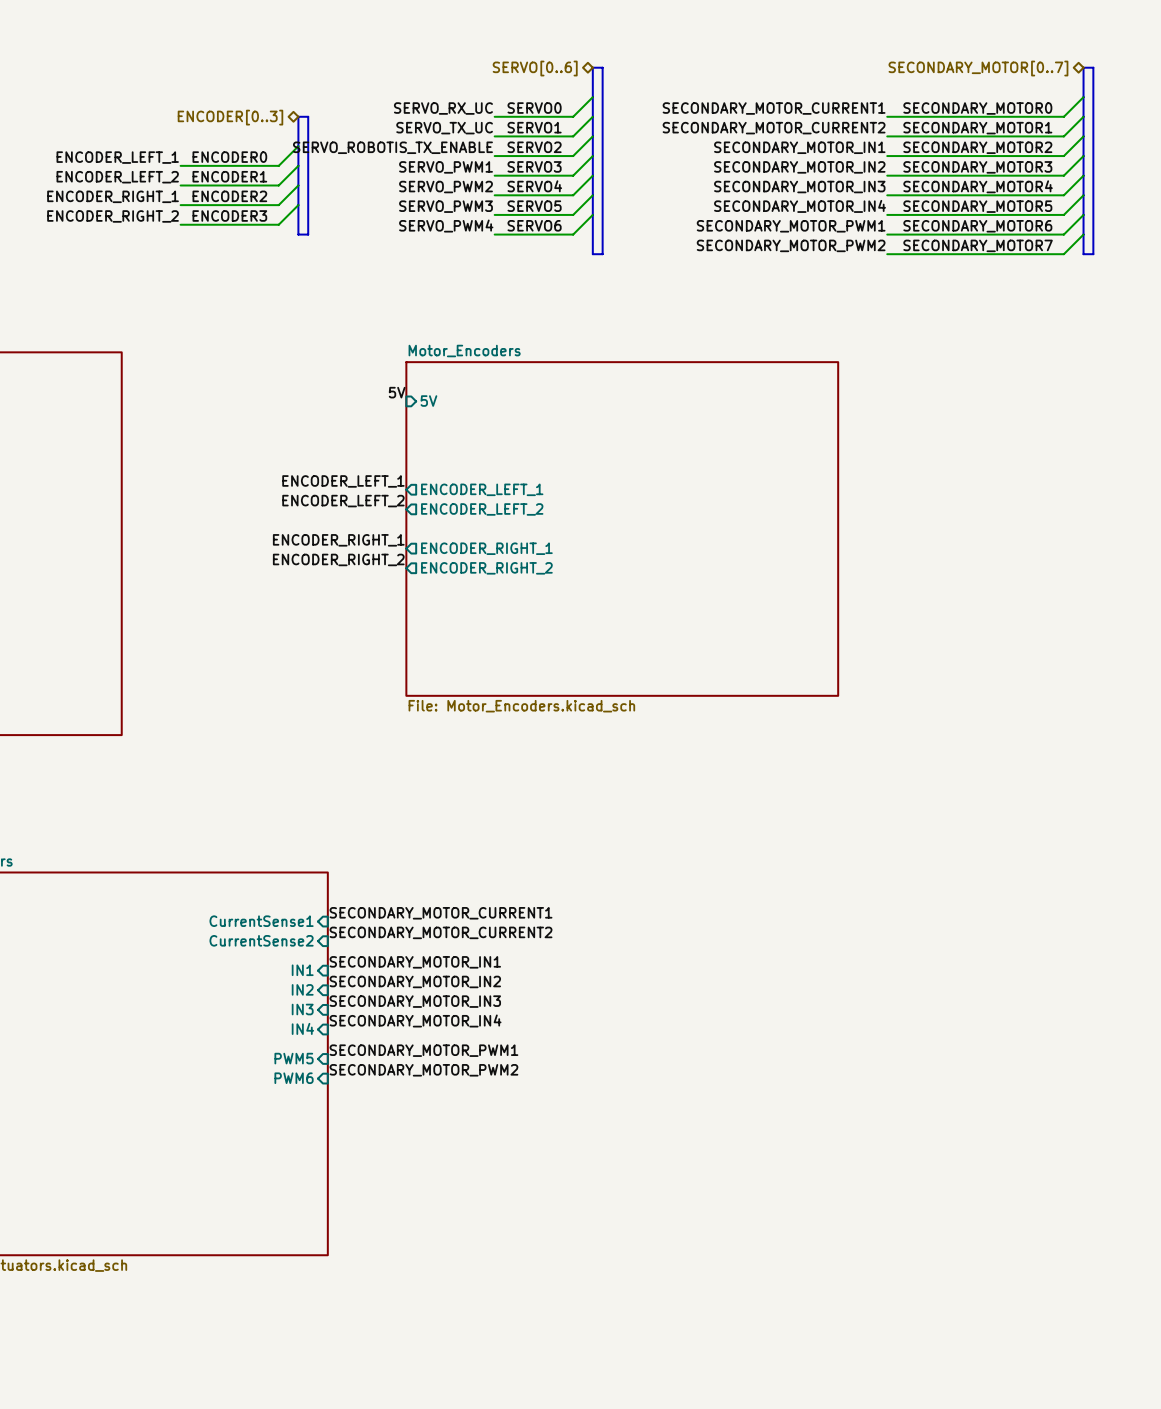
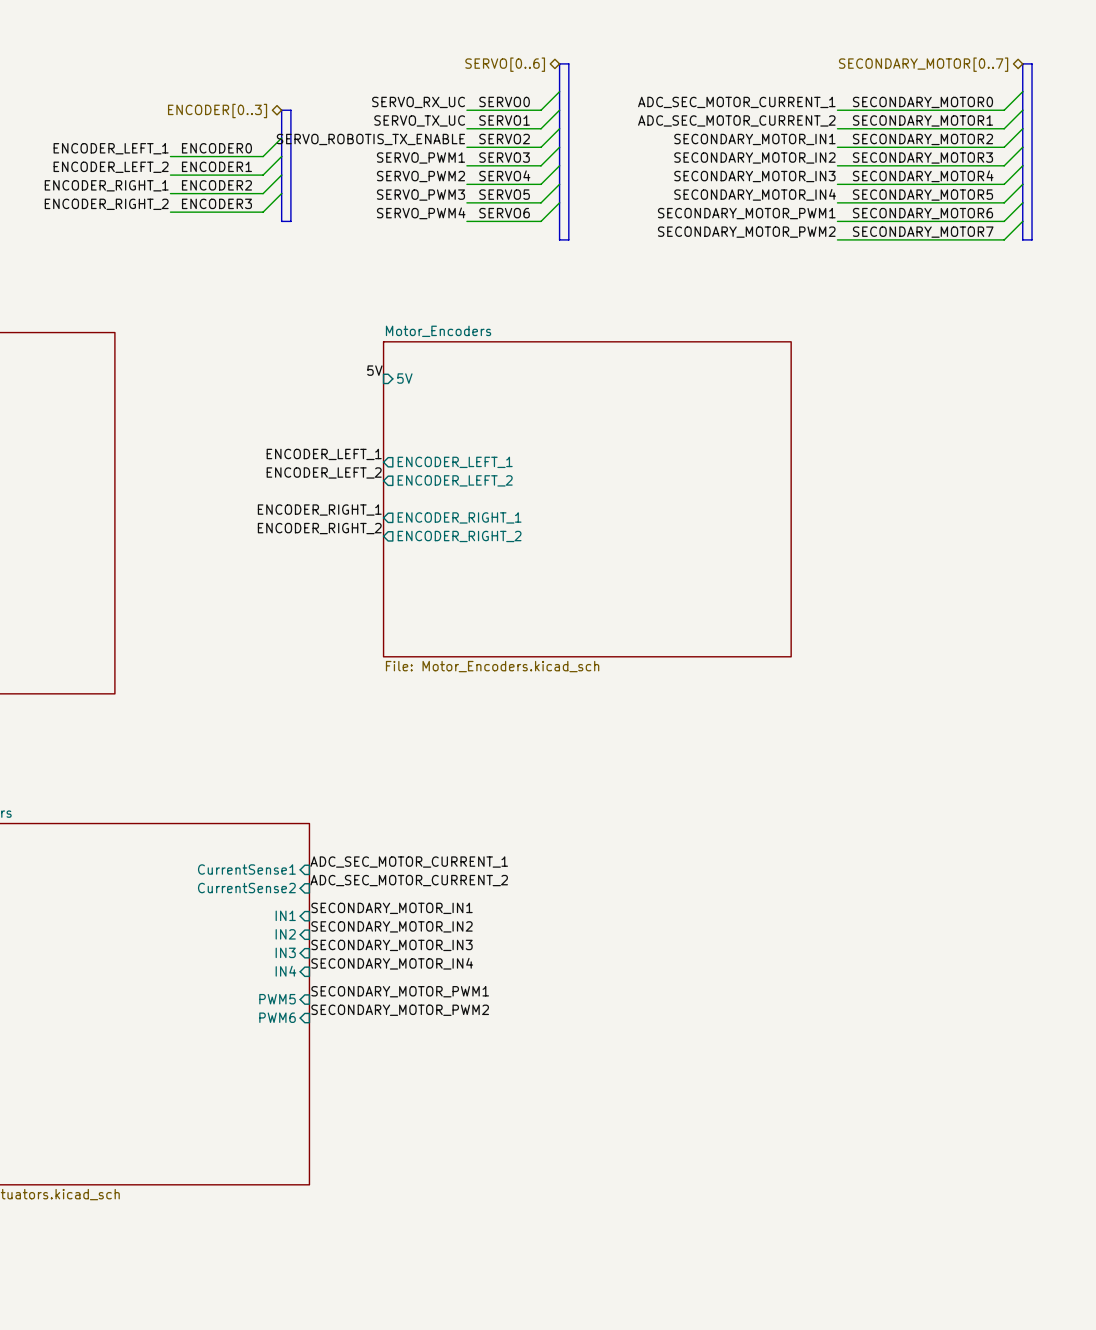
label: SECONDARY_MOTOR_CURRENT1 (774, 108) -> ADC_SEC_MOTOR_CURRENT_1 (736, 102)
label: SECONDARY_MOTOR_CURRENT2 (774, 128) -> ADC_SEC_MOTOR_CURRENT_2 (736, 120)
label: SECONDARY_MOTOR_CURRENT1 (441, 913) -> ADC_SEC_MOTOR_CURRENT_1 (409, 862)
label: SECONDARY_MOTOR_CURRENT2 (441, 932) -> ADC_SEC_MOTOR_CURRENT_2 (409, 880)

